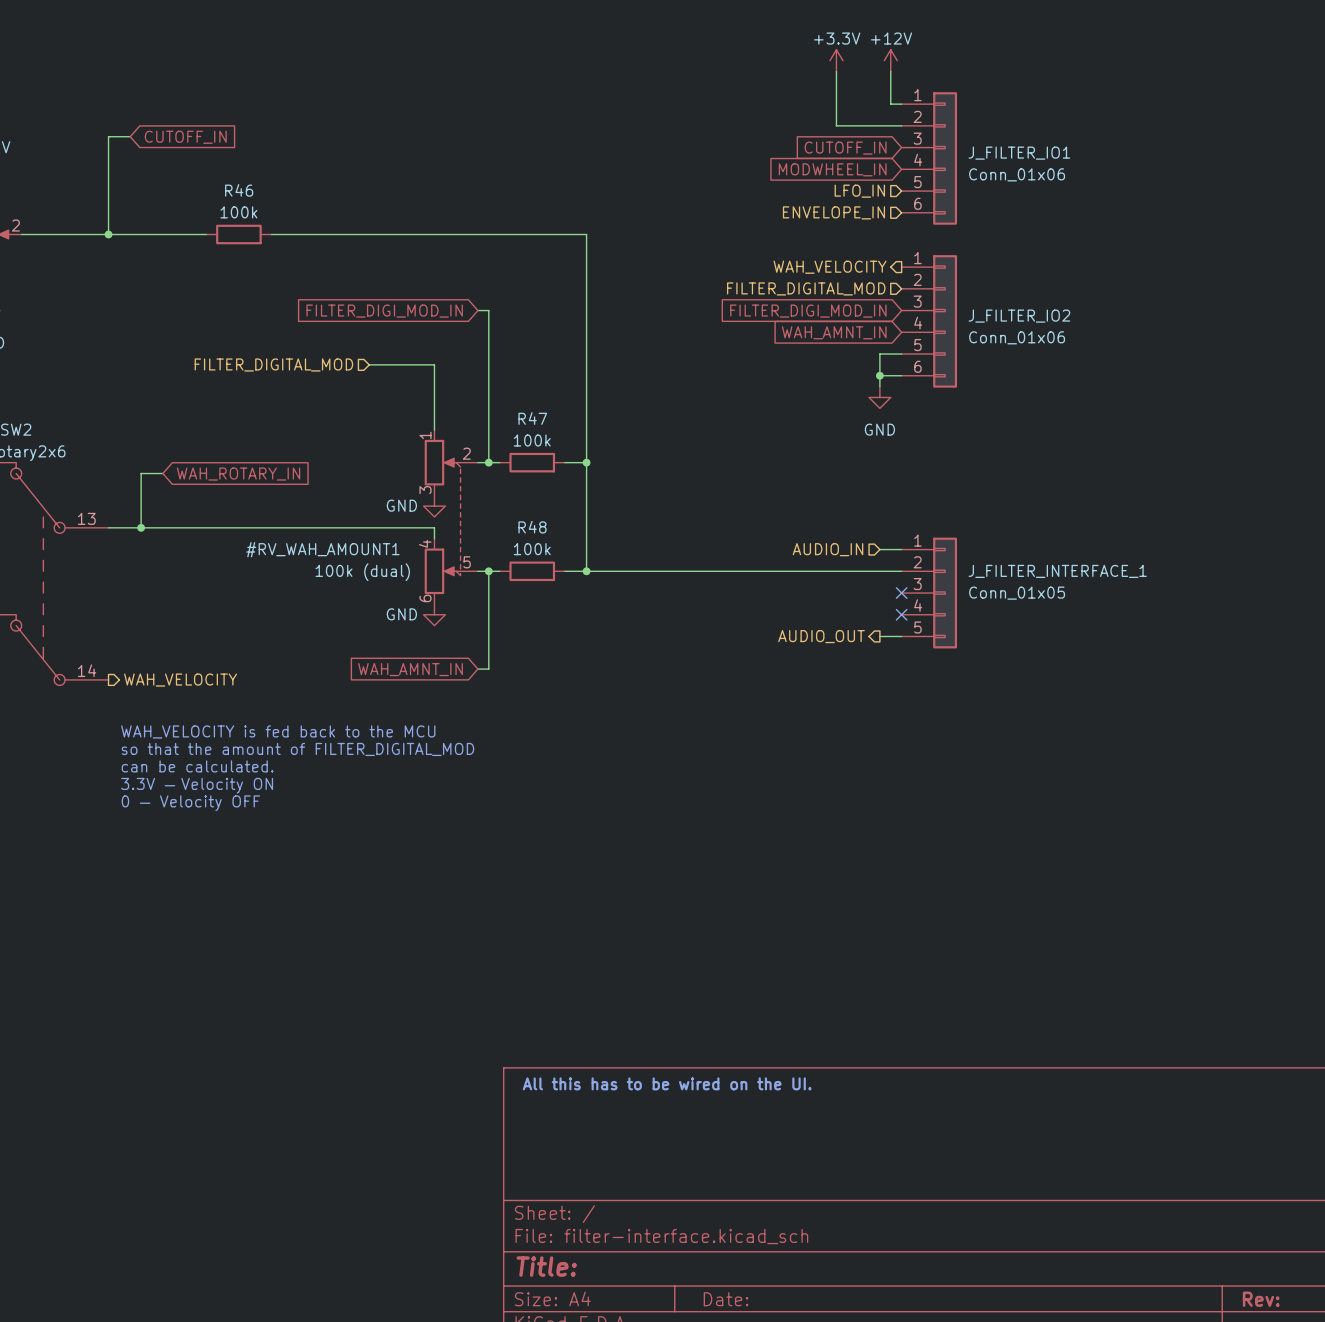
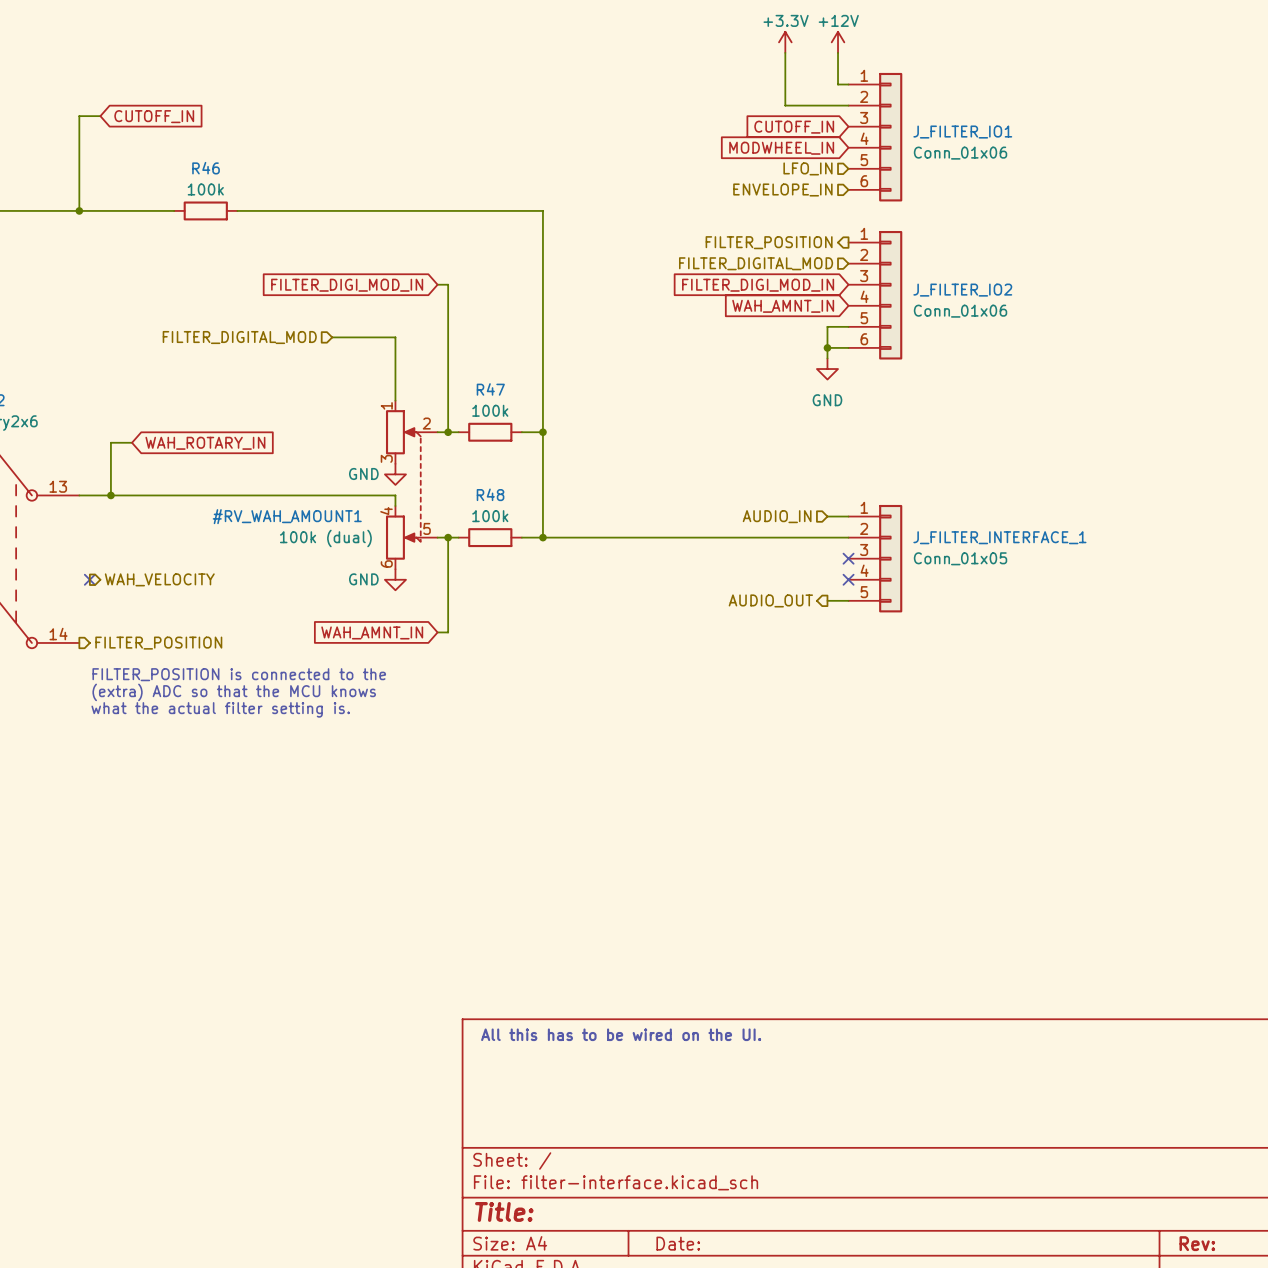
hierarchical label: WAH_VELOCITY (830, 267) -> FILTER_POSITION (769, 242)
no-connect mark: none -> (89, 579)
hierarchical label: none -> WAH_VELOCITY (159, 579)
hierarchical label: WAH_VELOCITY (180, 680) -> FILTER_POSITION (158, 643)
text: none -> FILTER_POSITION is connected to the (239, 674)
text: WAH_VELOCITY is fed back to the MCU (278, 731) -> (extra) ADC so that the MCU knows (234, 692)
text: so that the amount of FILTER_DIGITAL_MOD (297, 749) -> what the actual filter setting is. (220, 709)
text: can be calculated. (197, 766) -> none
text: 3.3V — Velocity ON (197, 785) -> none
text: 0 — Velocity OFF (190, 803) -> none

